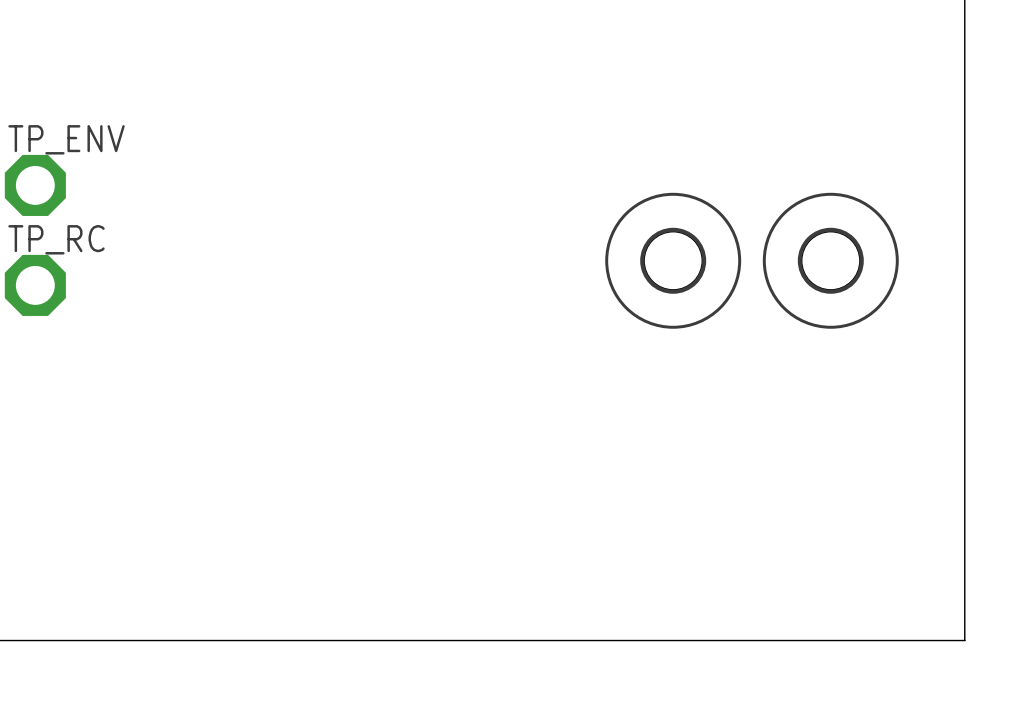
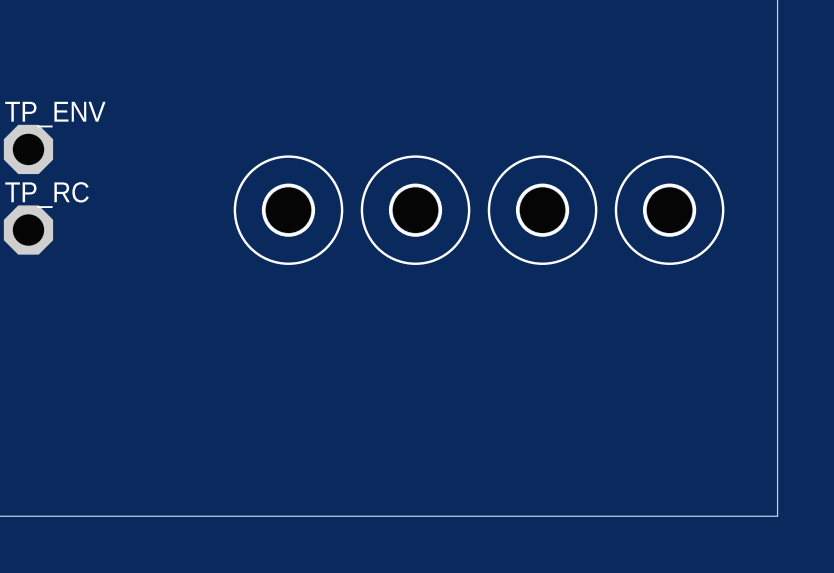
part: none -> (288, 210)
part: none -> (415, 210)

